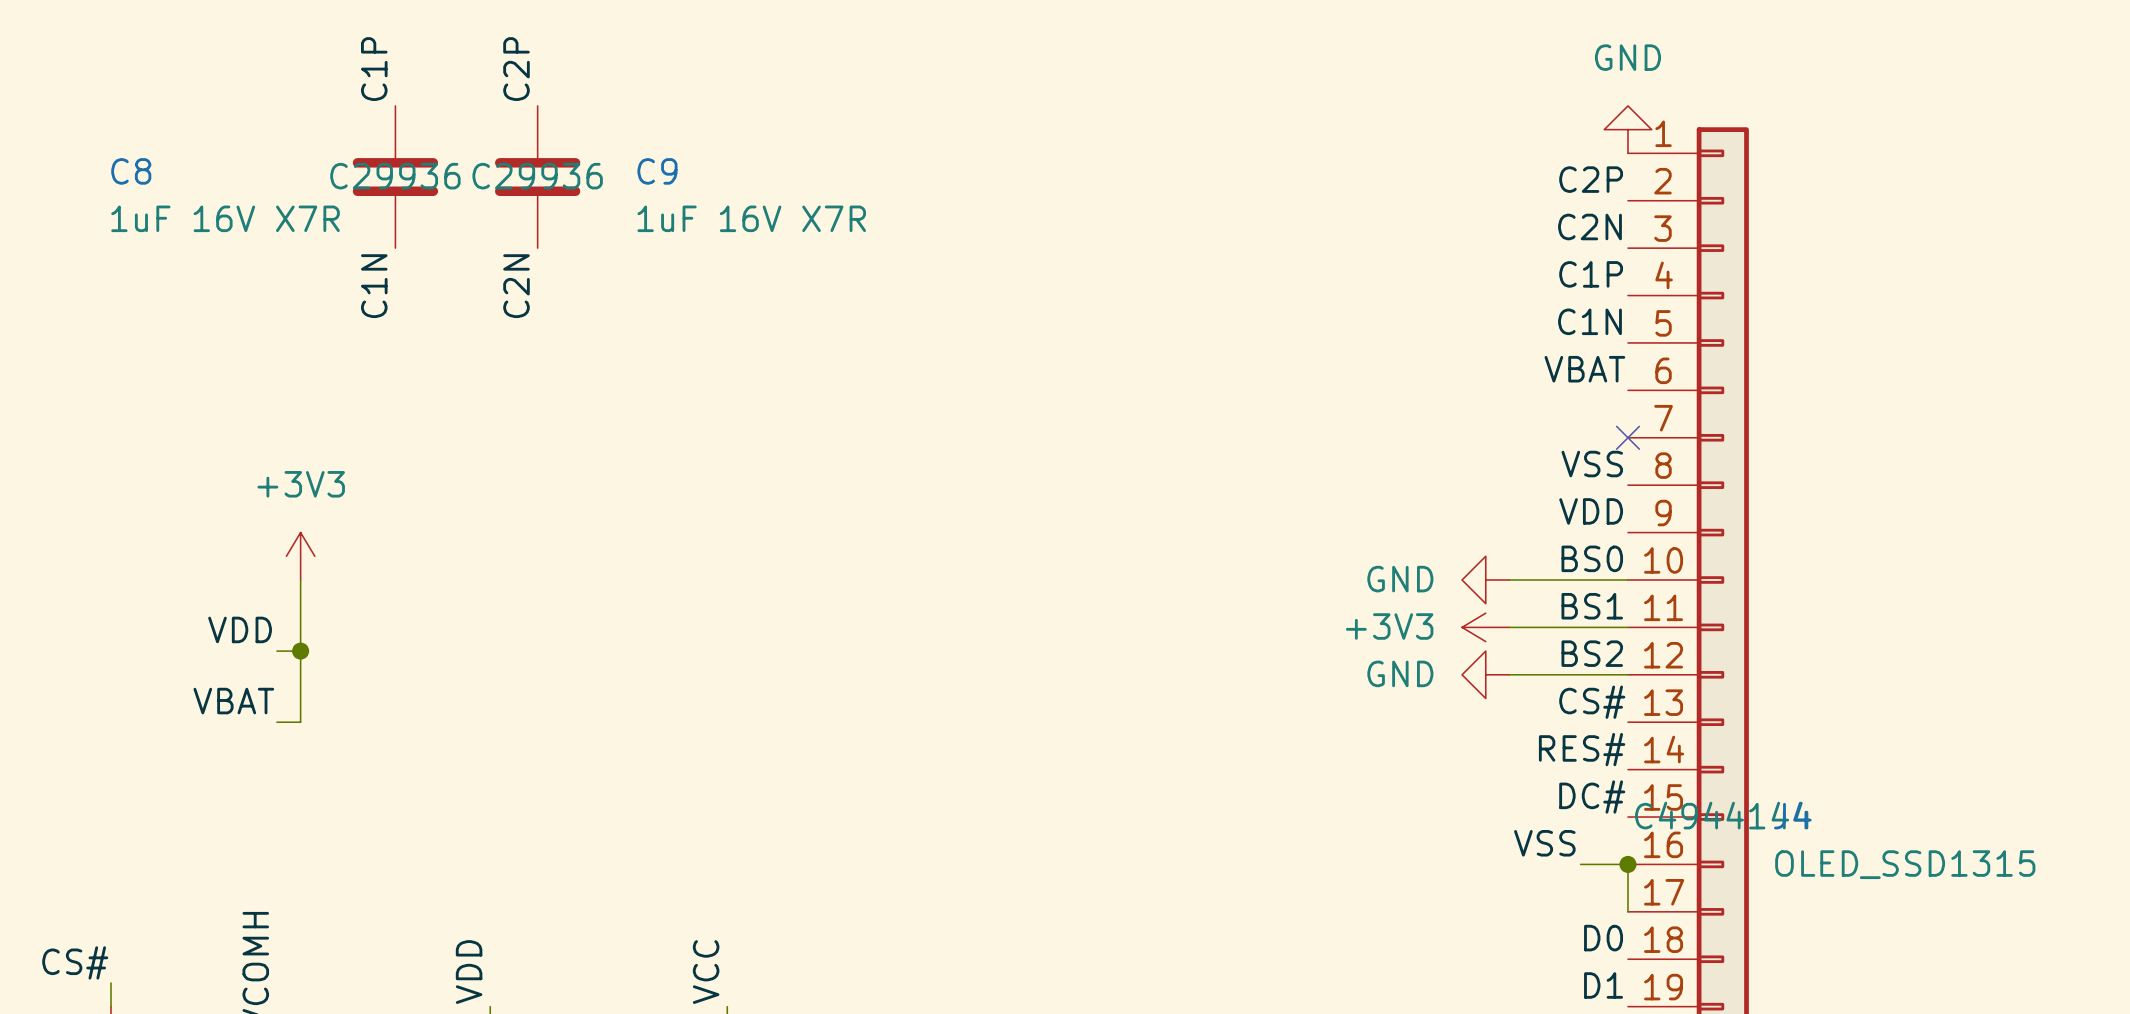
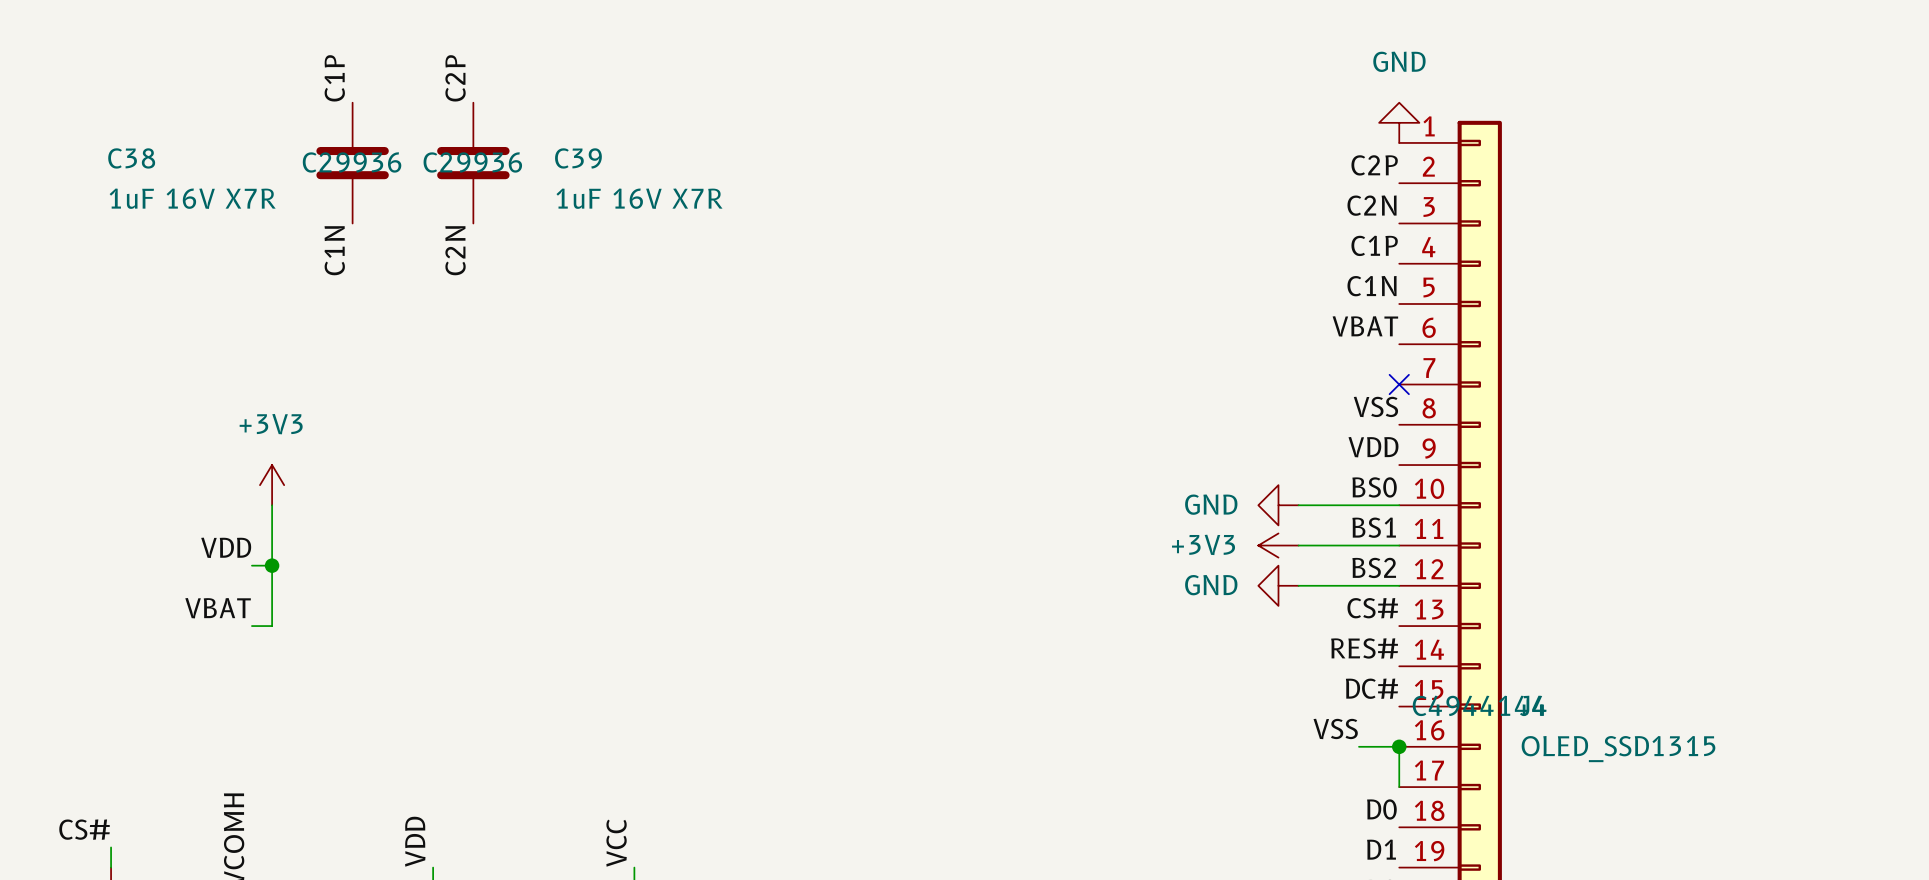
C8 name: C8 (131, 171) -> C38 (131, 158)
C9 name: C9 (657, 171) -> C39 (578, 158)

